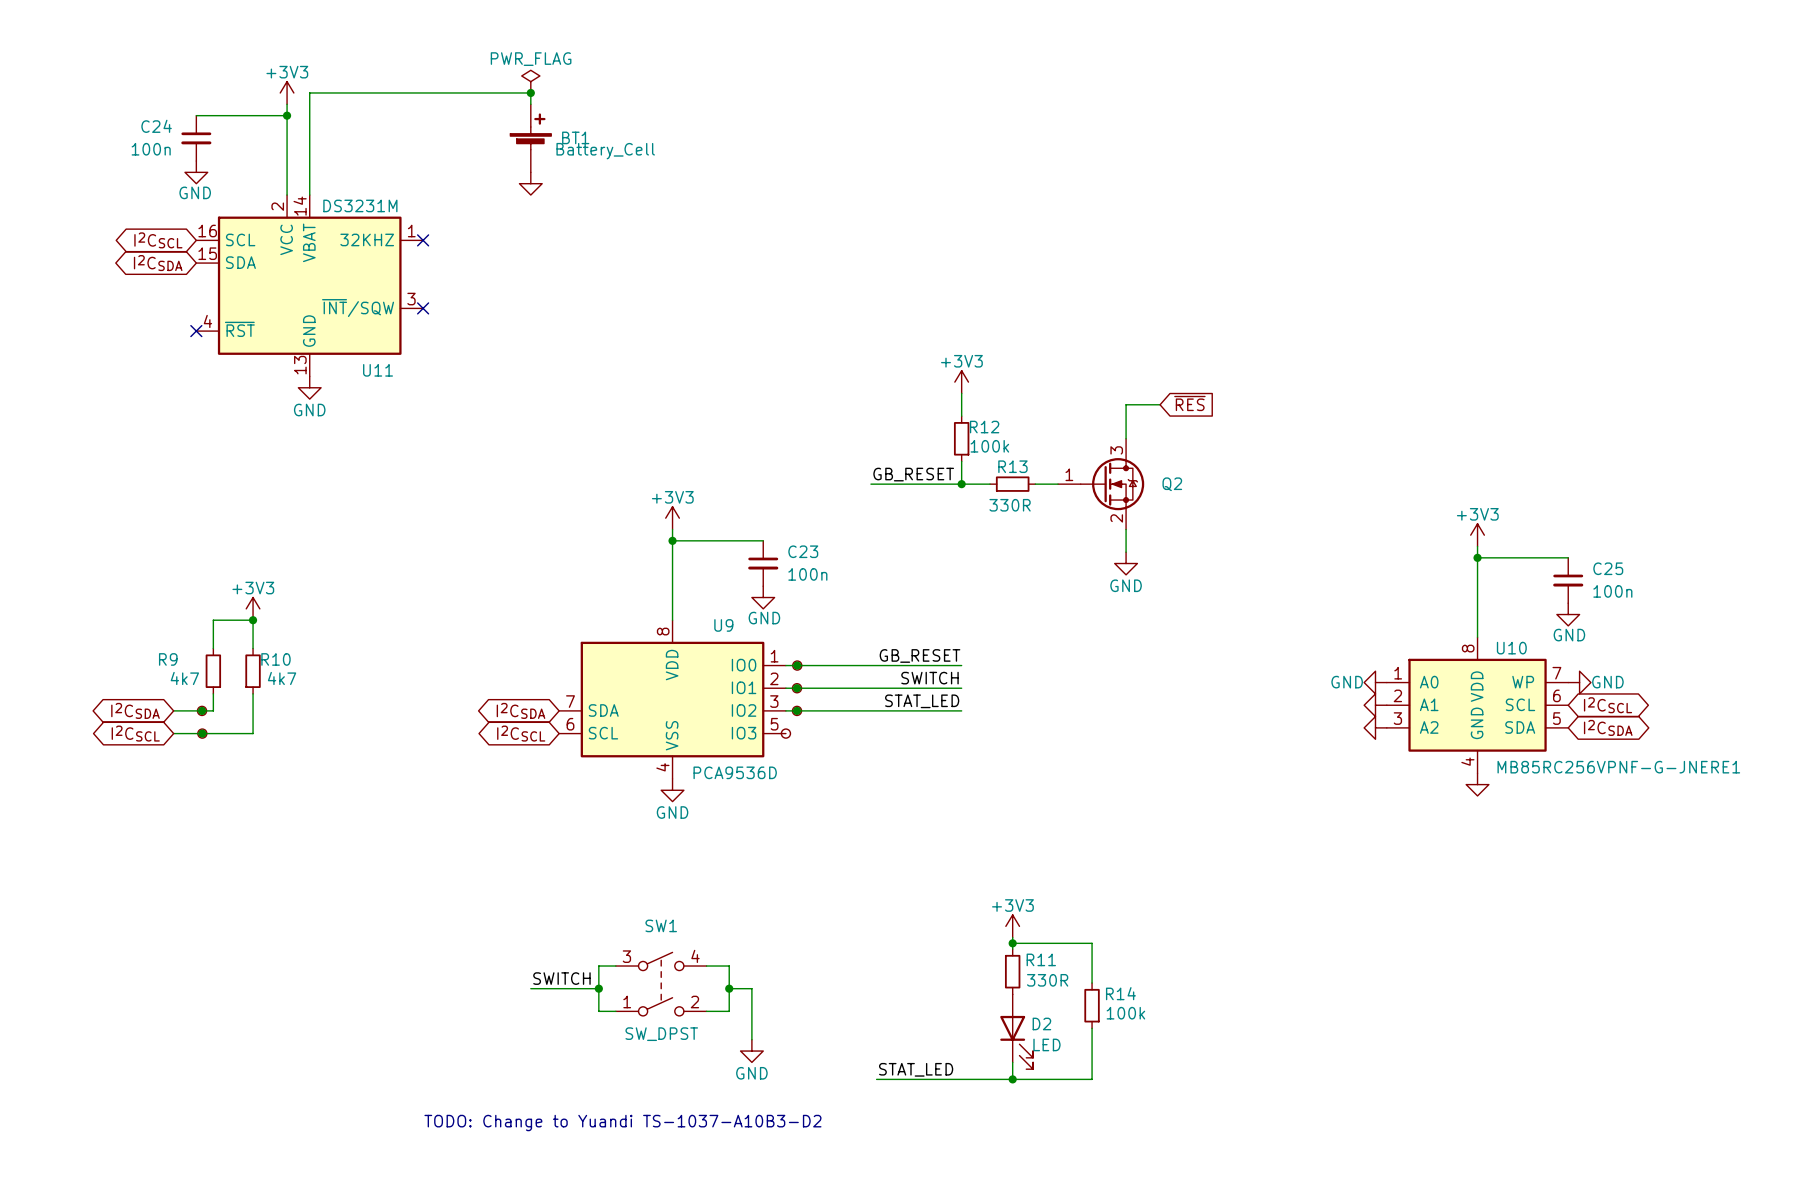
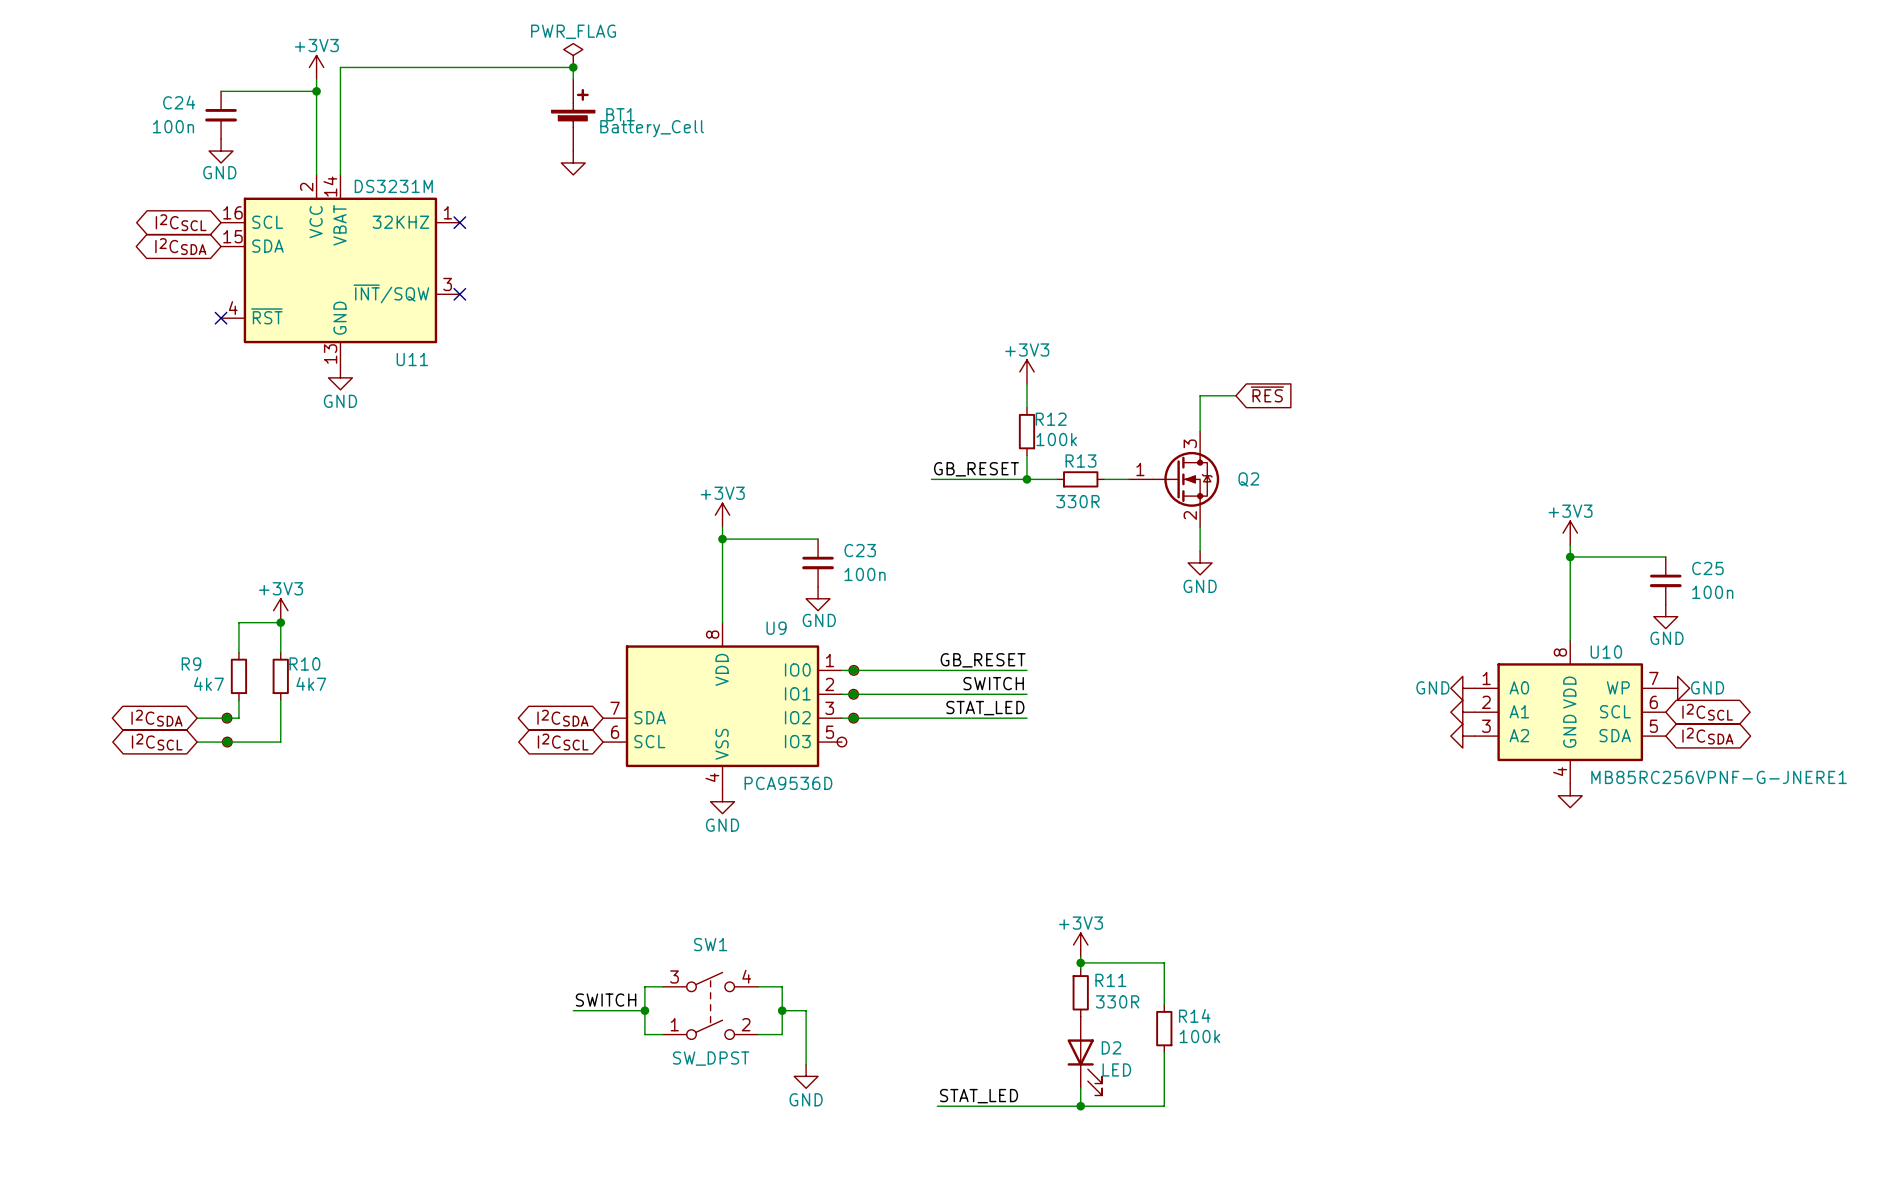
text: TODO: Change to Yuandi TS-1037-A10B3-D2 (622, 1123) -> none

